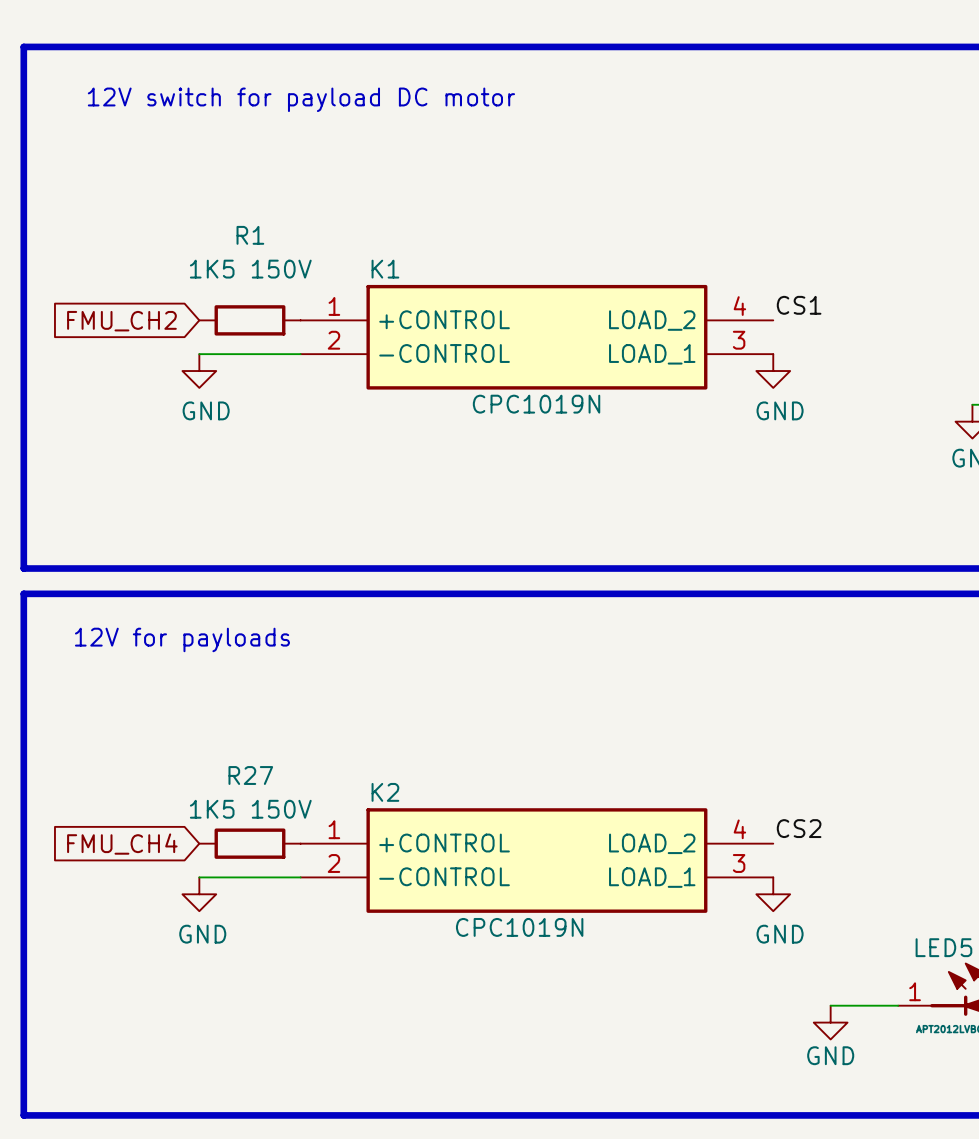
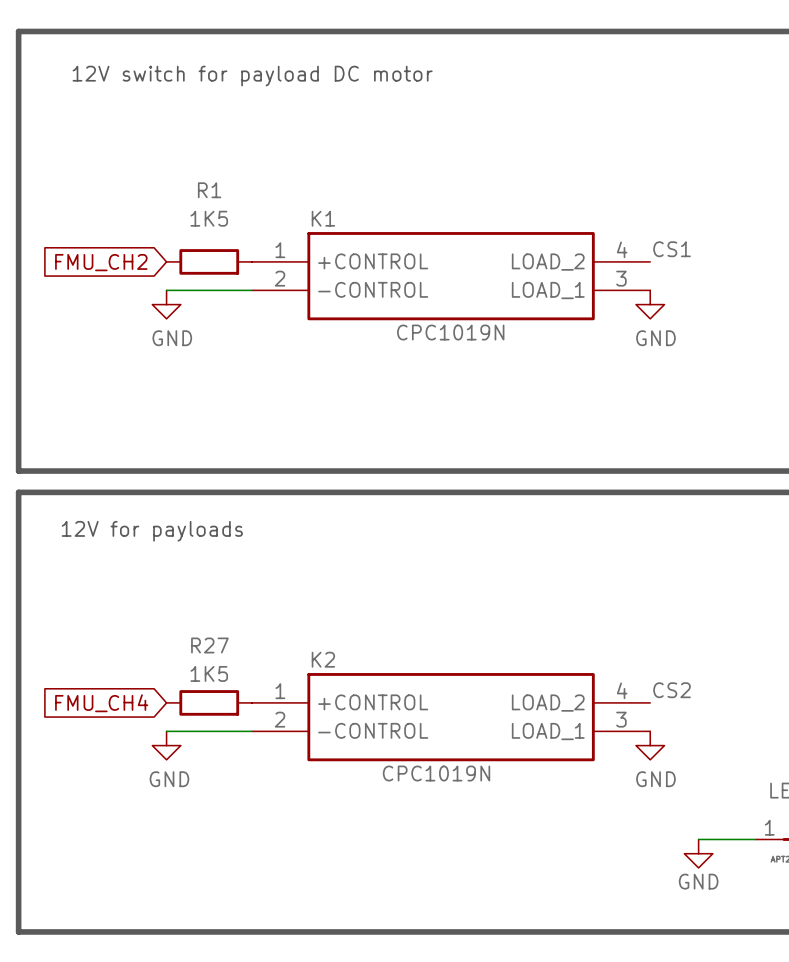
R1 value: 1K5 150V (250, 269) -> 1K5 (209, 218)
R27 value: 1K5 150V (250, 809) -> 1K5 (209, 673)

